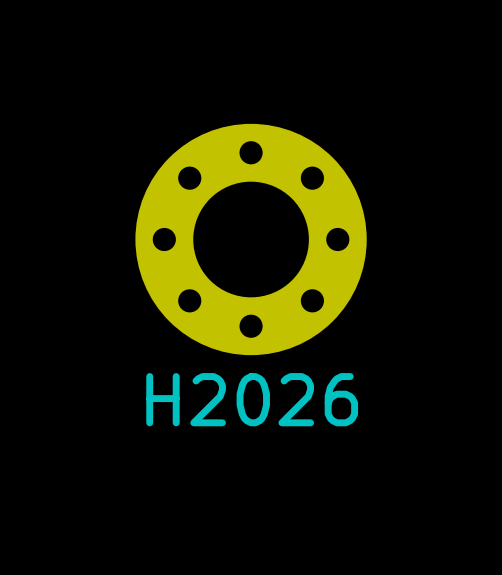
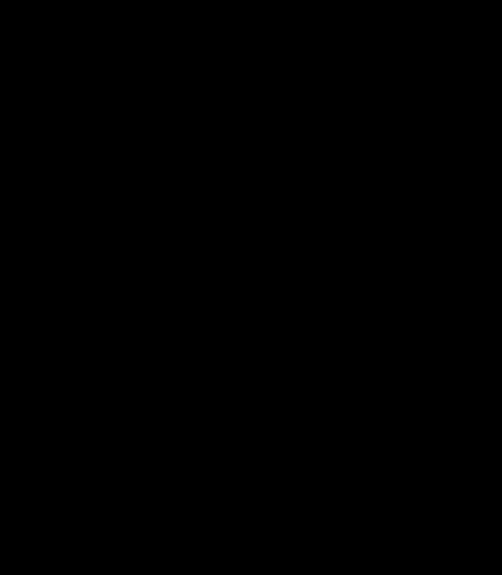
H2026: (251, 239) -> none

